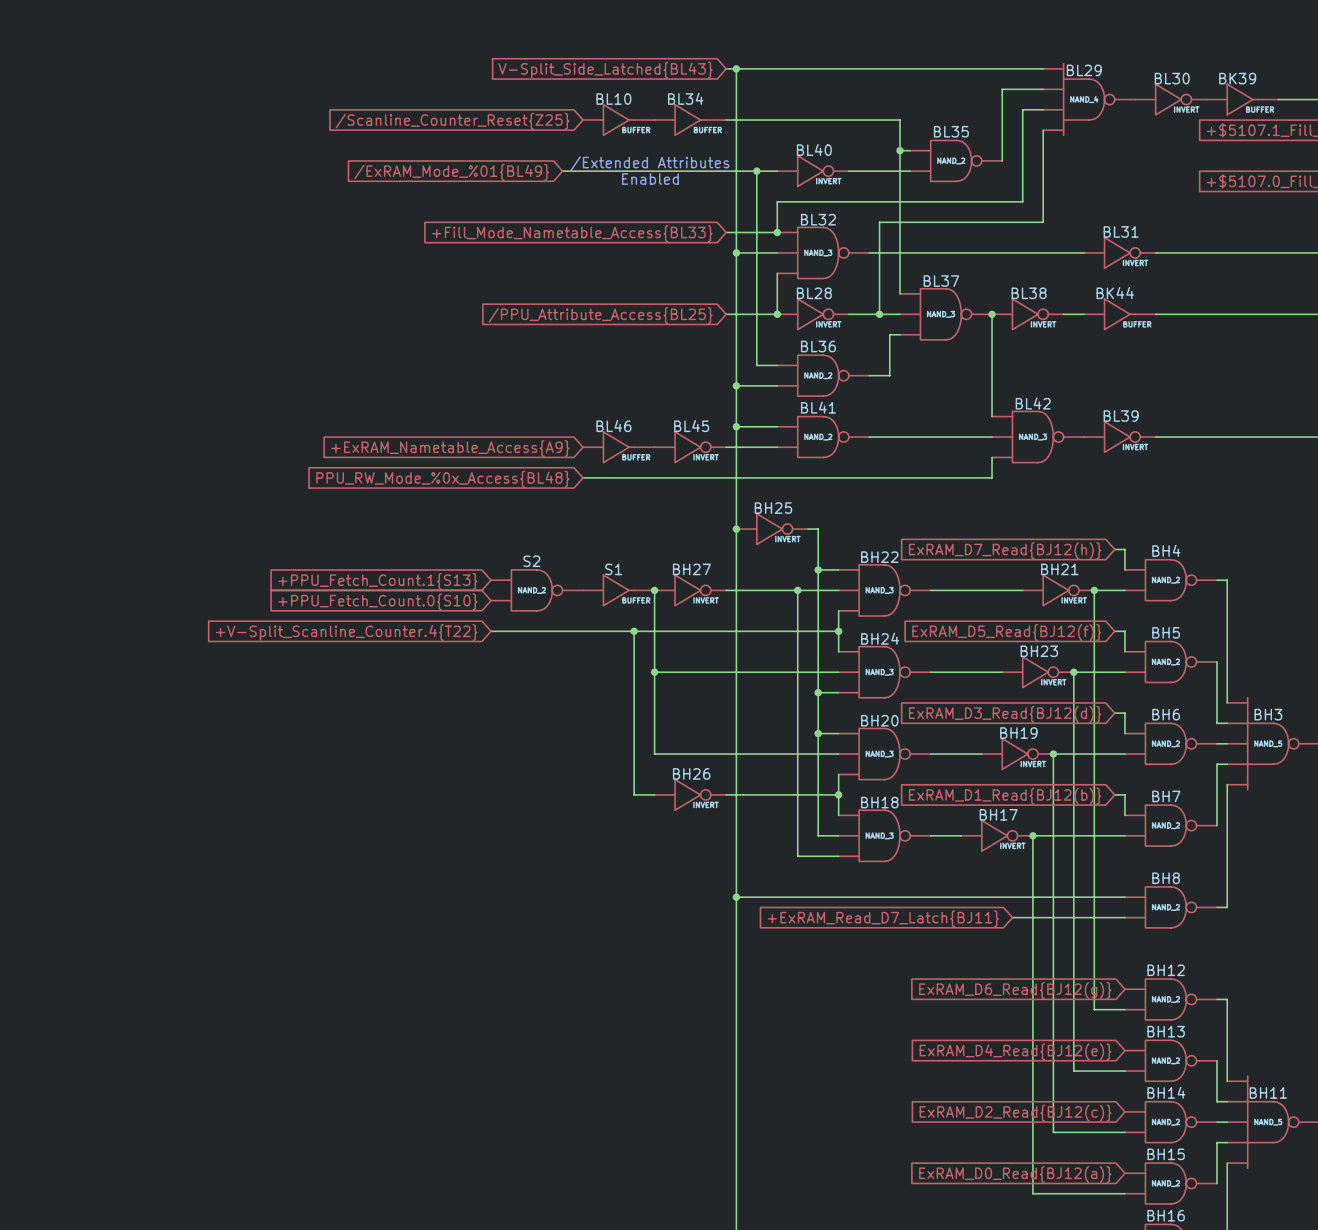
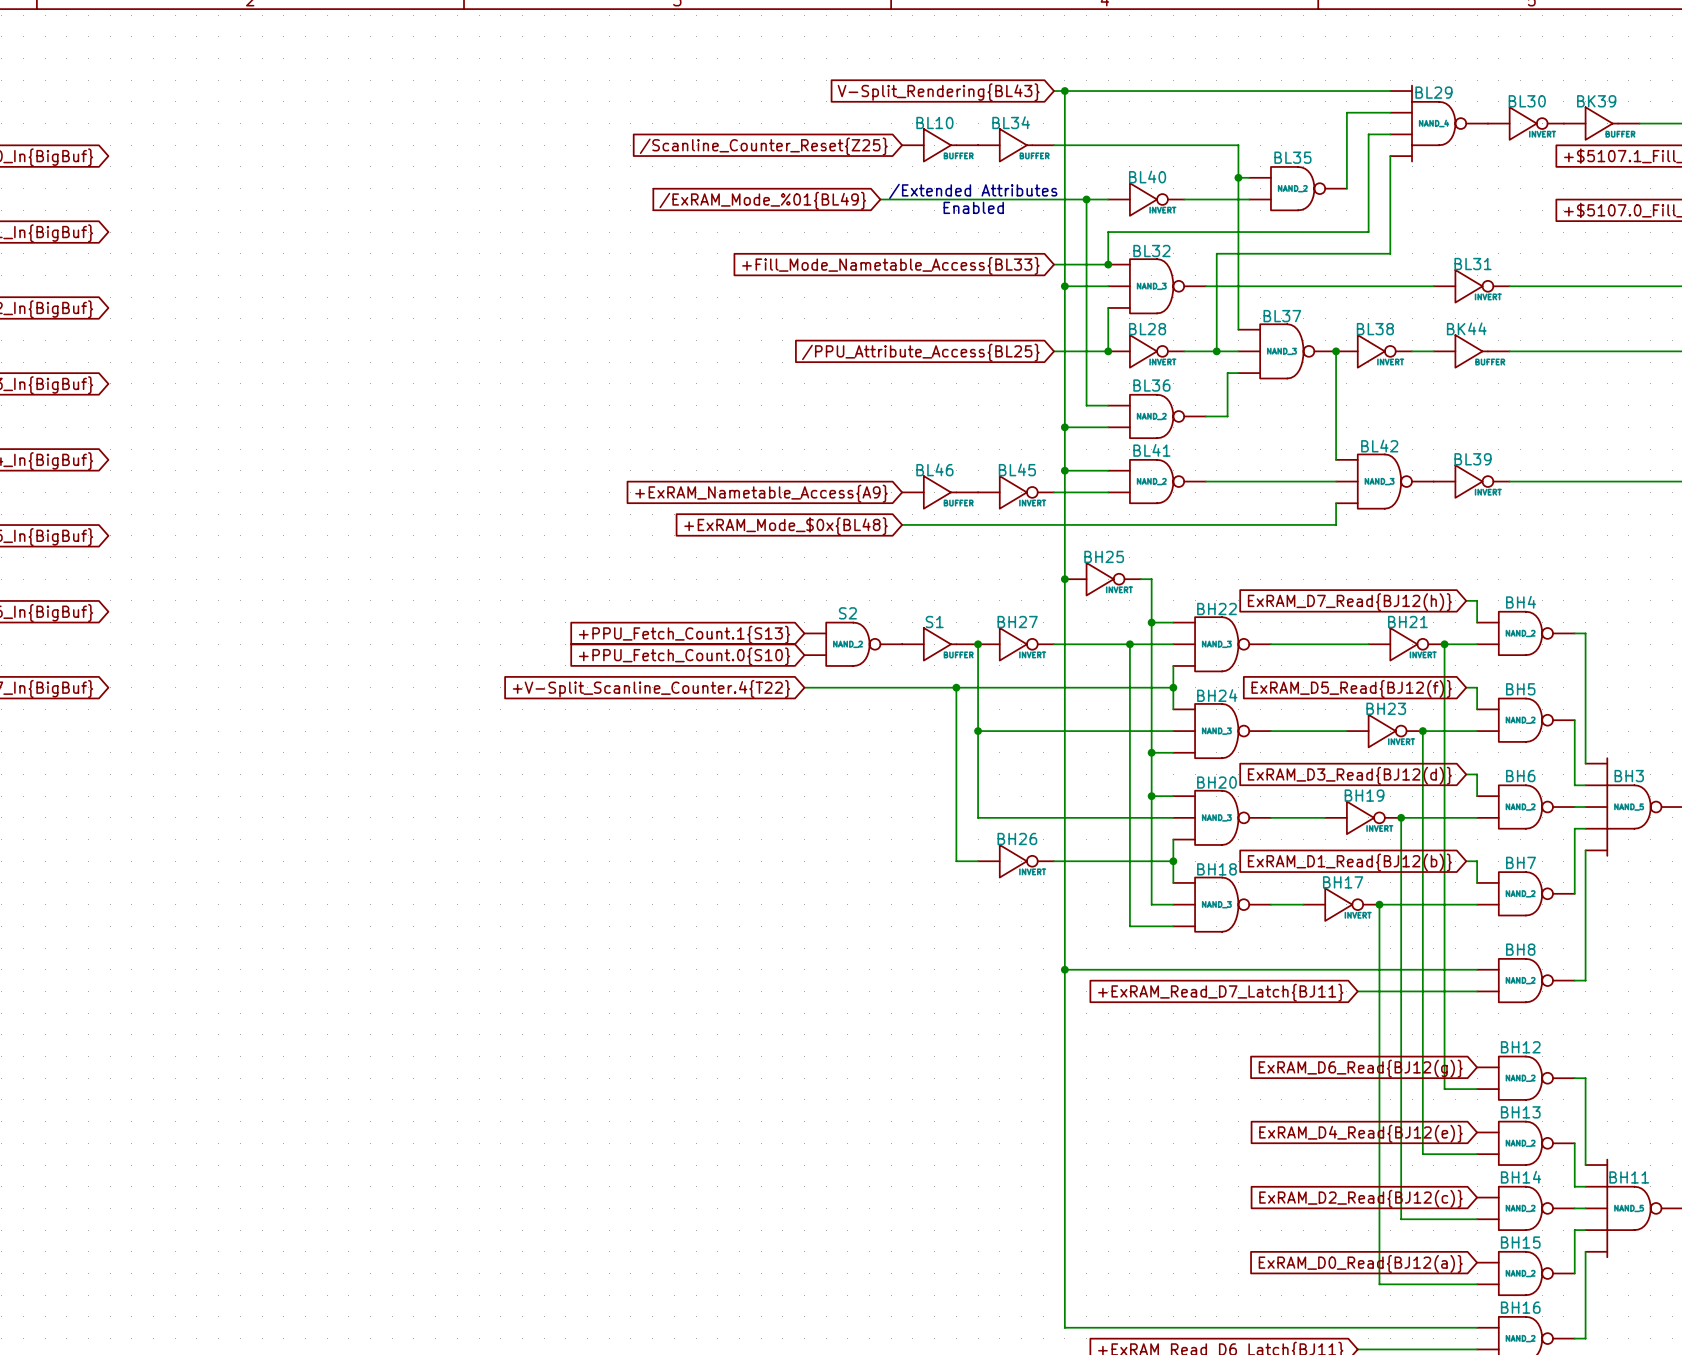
global label: V-Split_Side_Latched{BL43} (605, 70) -> V-Split_Rendering{BL43} (938, 92)
global label: PPU_RW_Mode_%0x_Access{BL48} (442, 479) -> +ExRAM_Mode_$0x{BL48} (786, 526)

